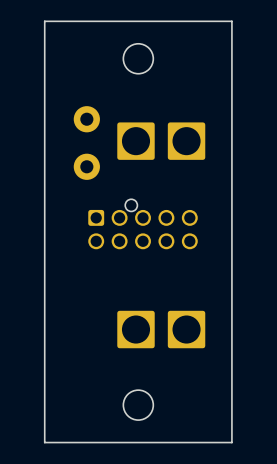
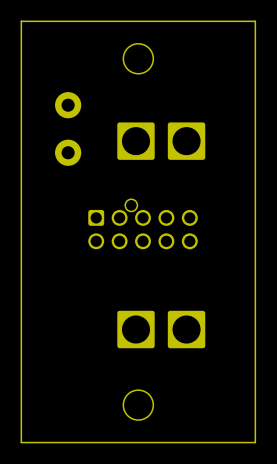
board edge: (44, 21) (44, 442) -> (44, 21) (21, 21) (21, 442) (44, 442)
board edge: (231, 21) (231, 442) -> (231, 21) (255, 21) (255, 442) (231, 442)
part position: (86, 143) -> (68, 128)

